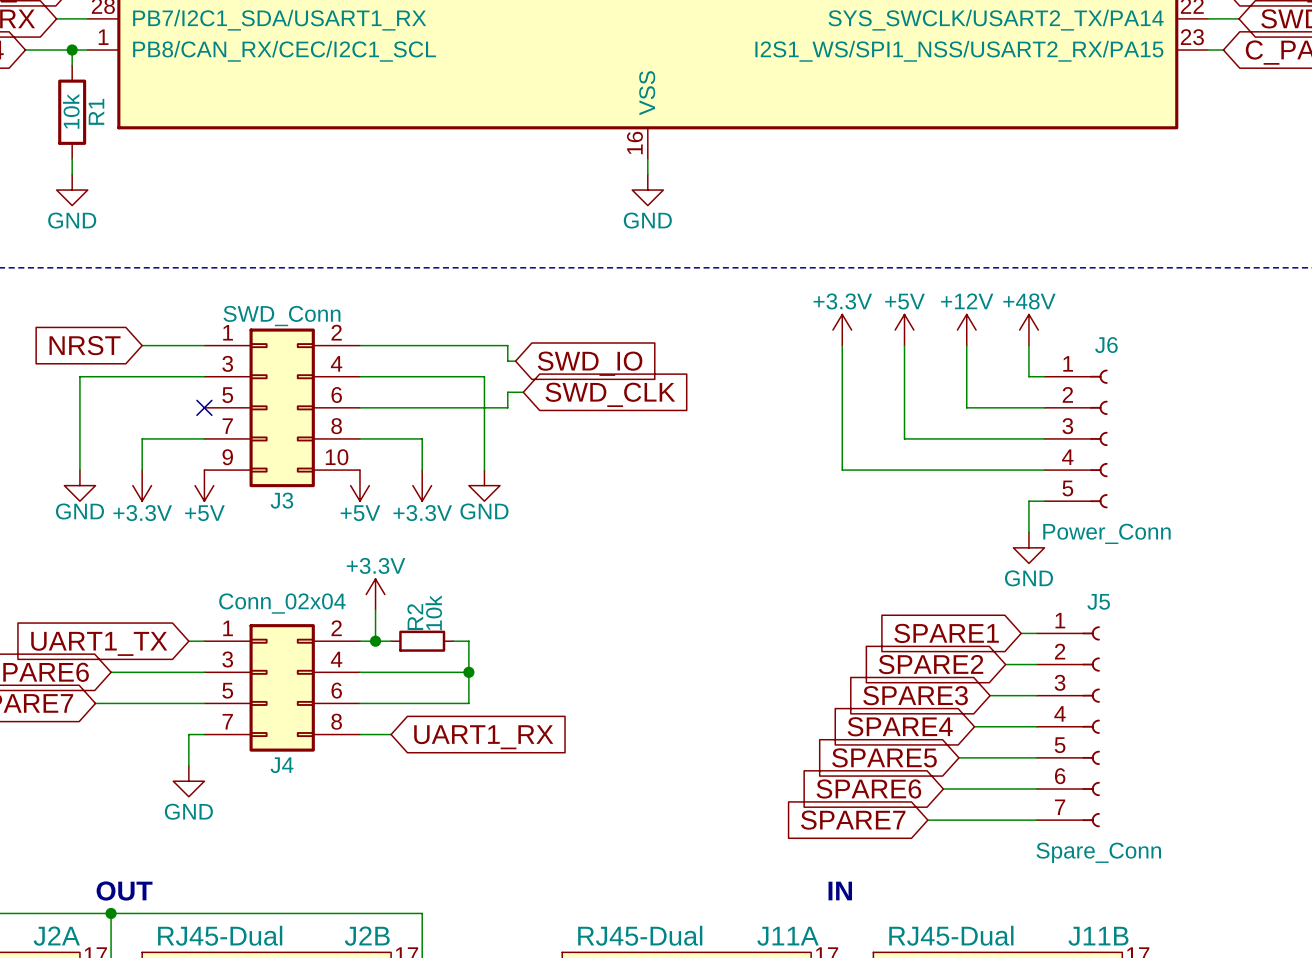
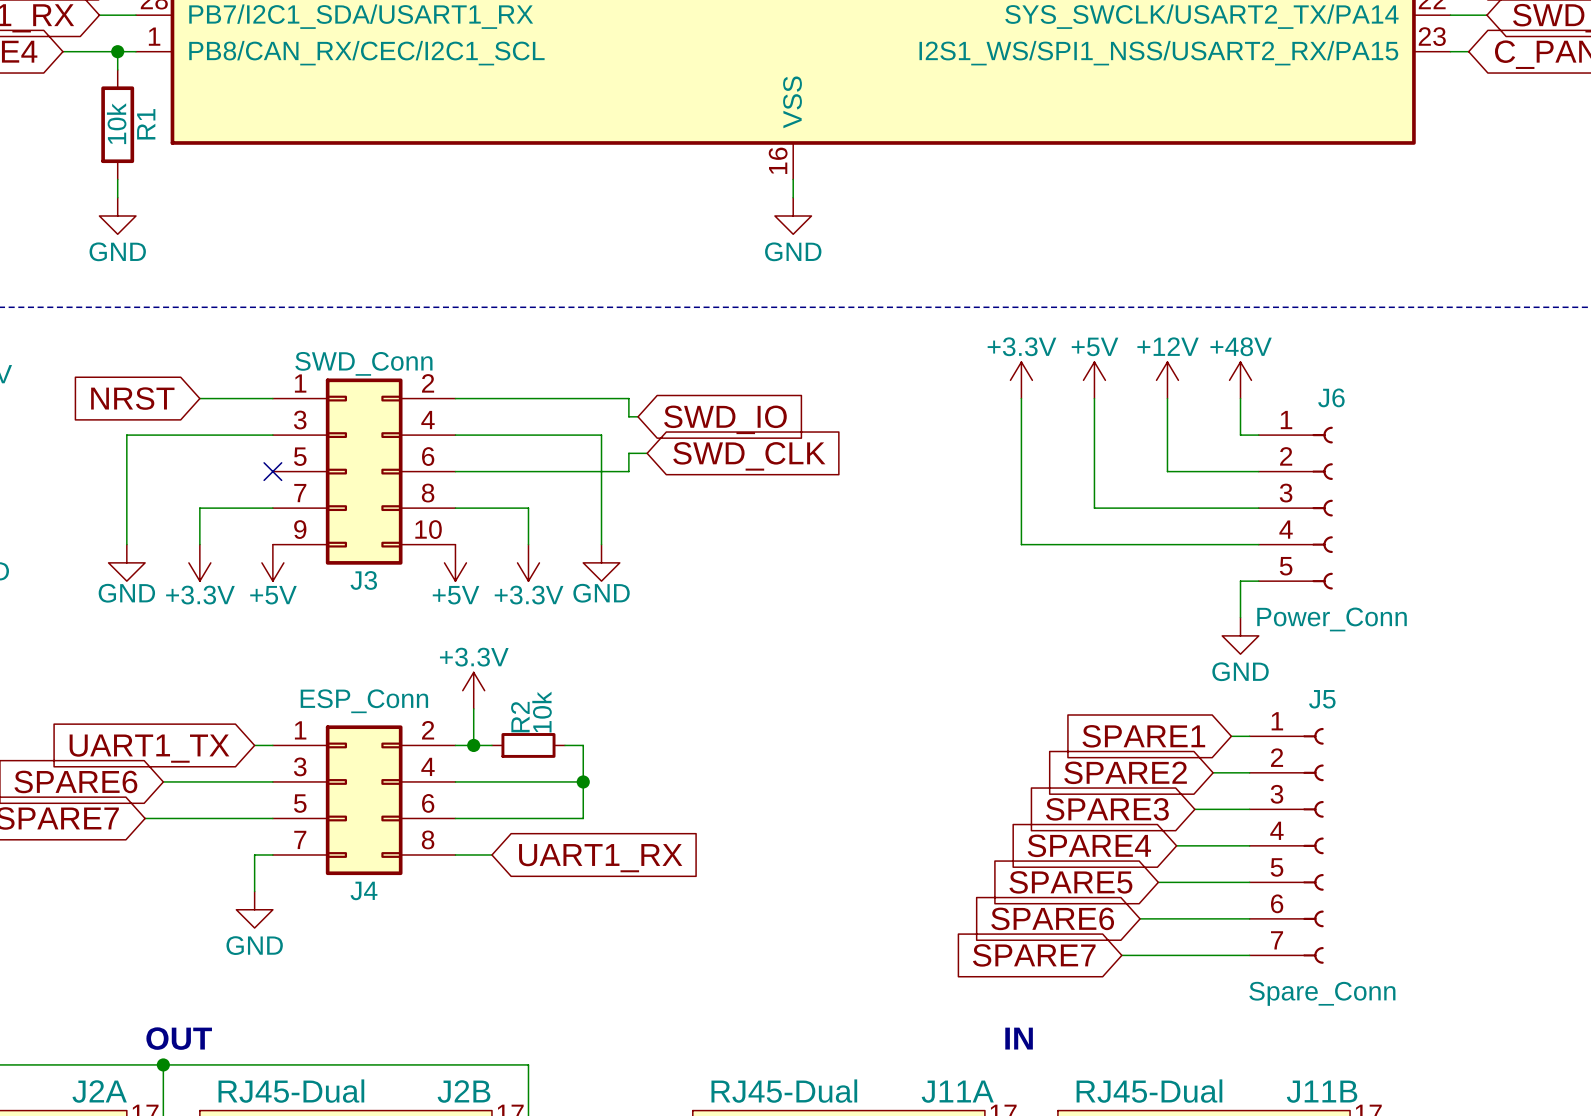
J4 value: Conn_02x04 (282, 603) -> ESP_Conn (364, 701)

